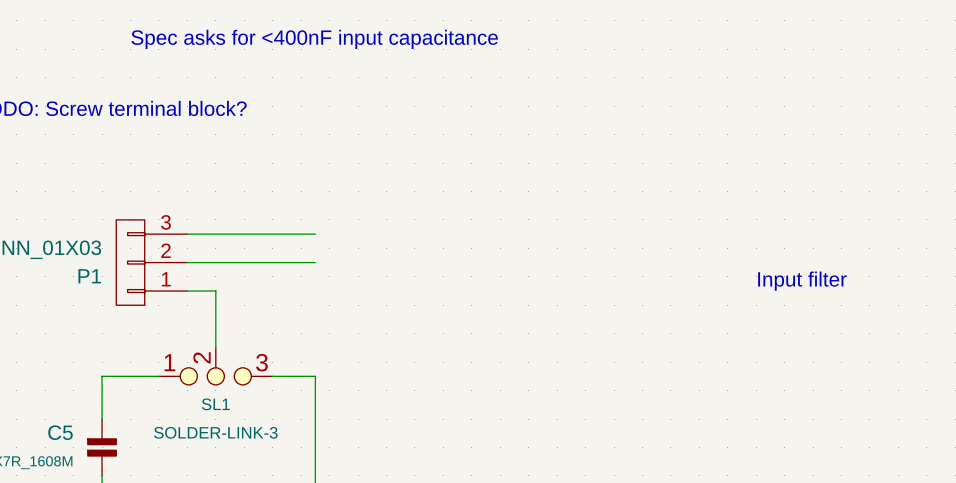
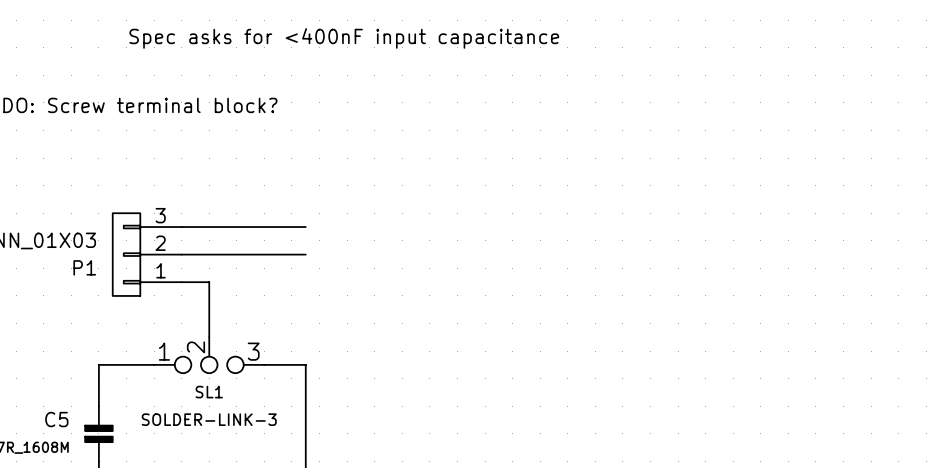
text: Input filter (802, 281) -> none

